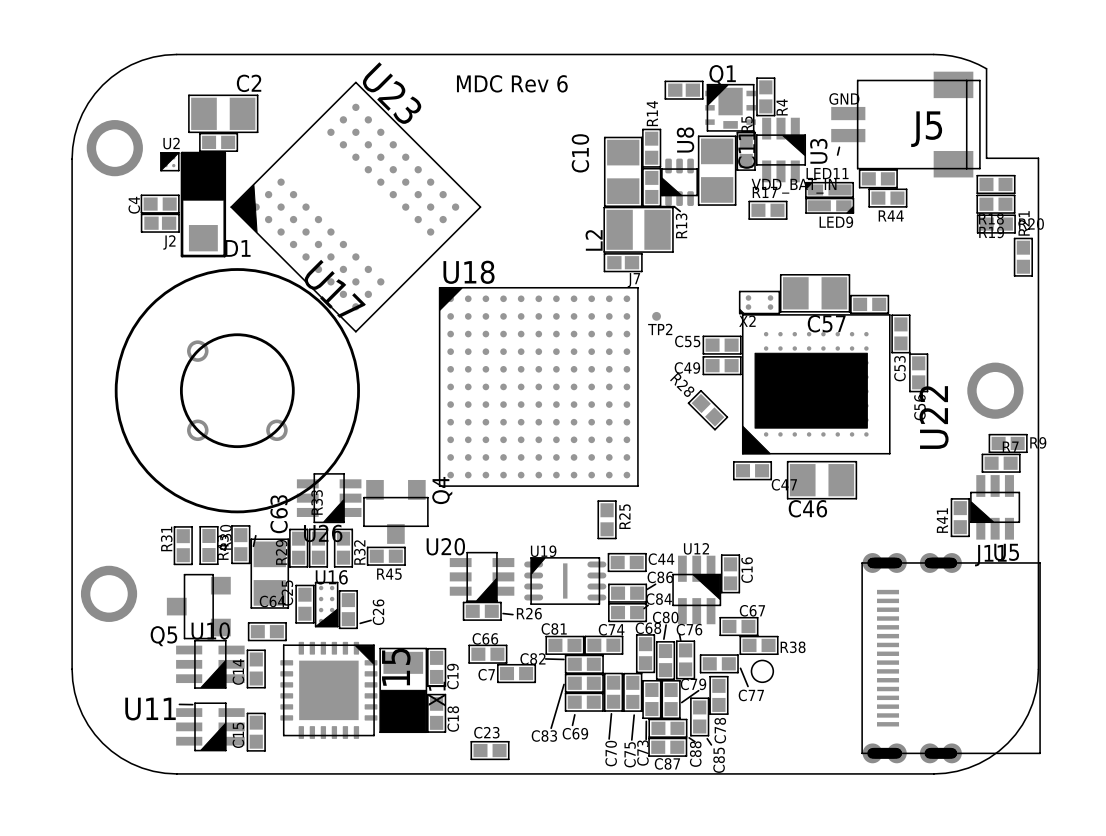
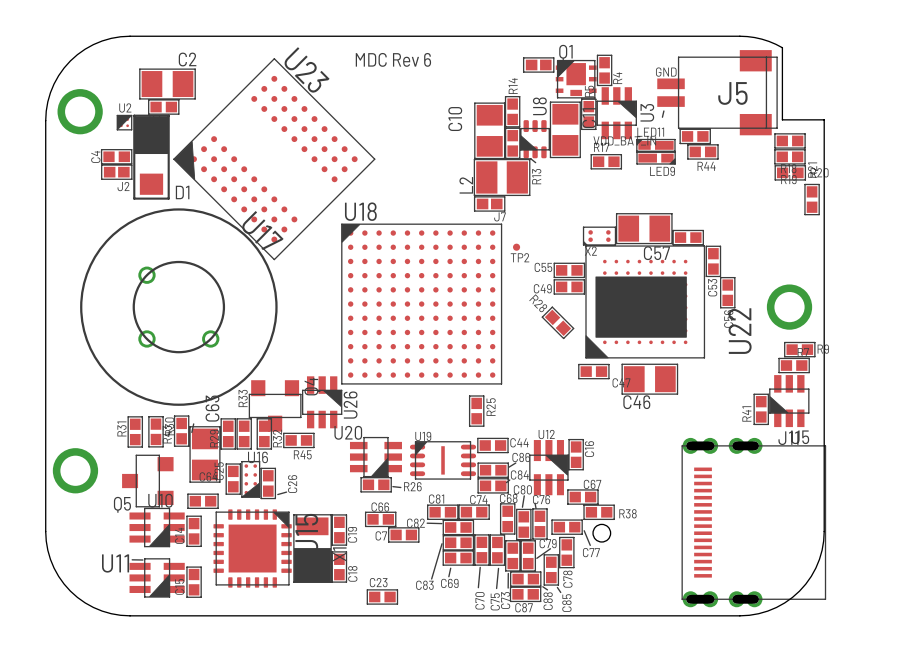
U26 rotation: 0° (329, 498) -> 90° counterclockwise (322, 402)
U26 position: (329, 498) -> (322, 402)
Q4 position: (395, 511) -> (275, 405)

